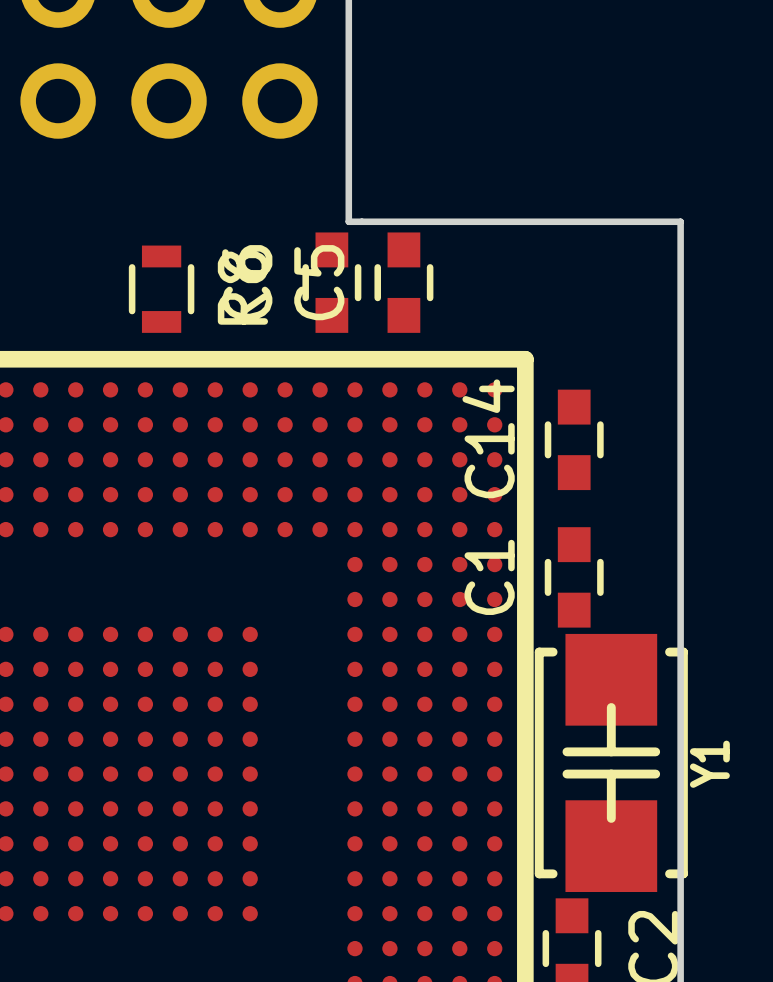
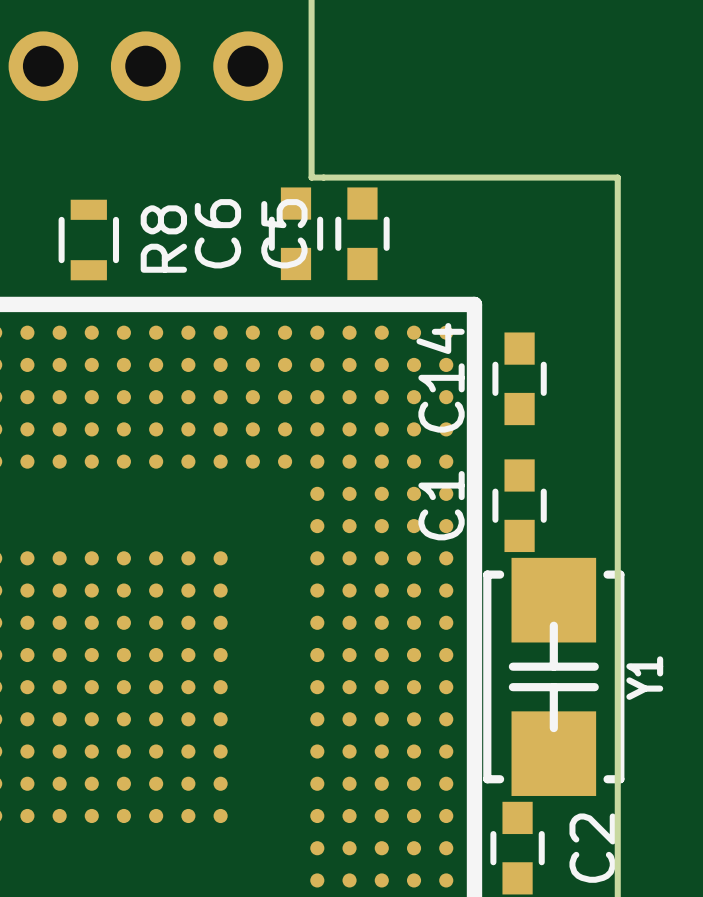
R8 position: (161, 289) -> (88, 240)

